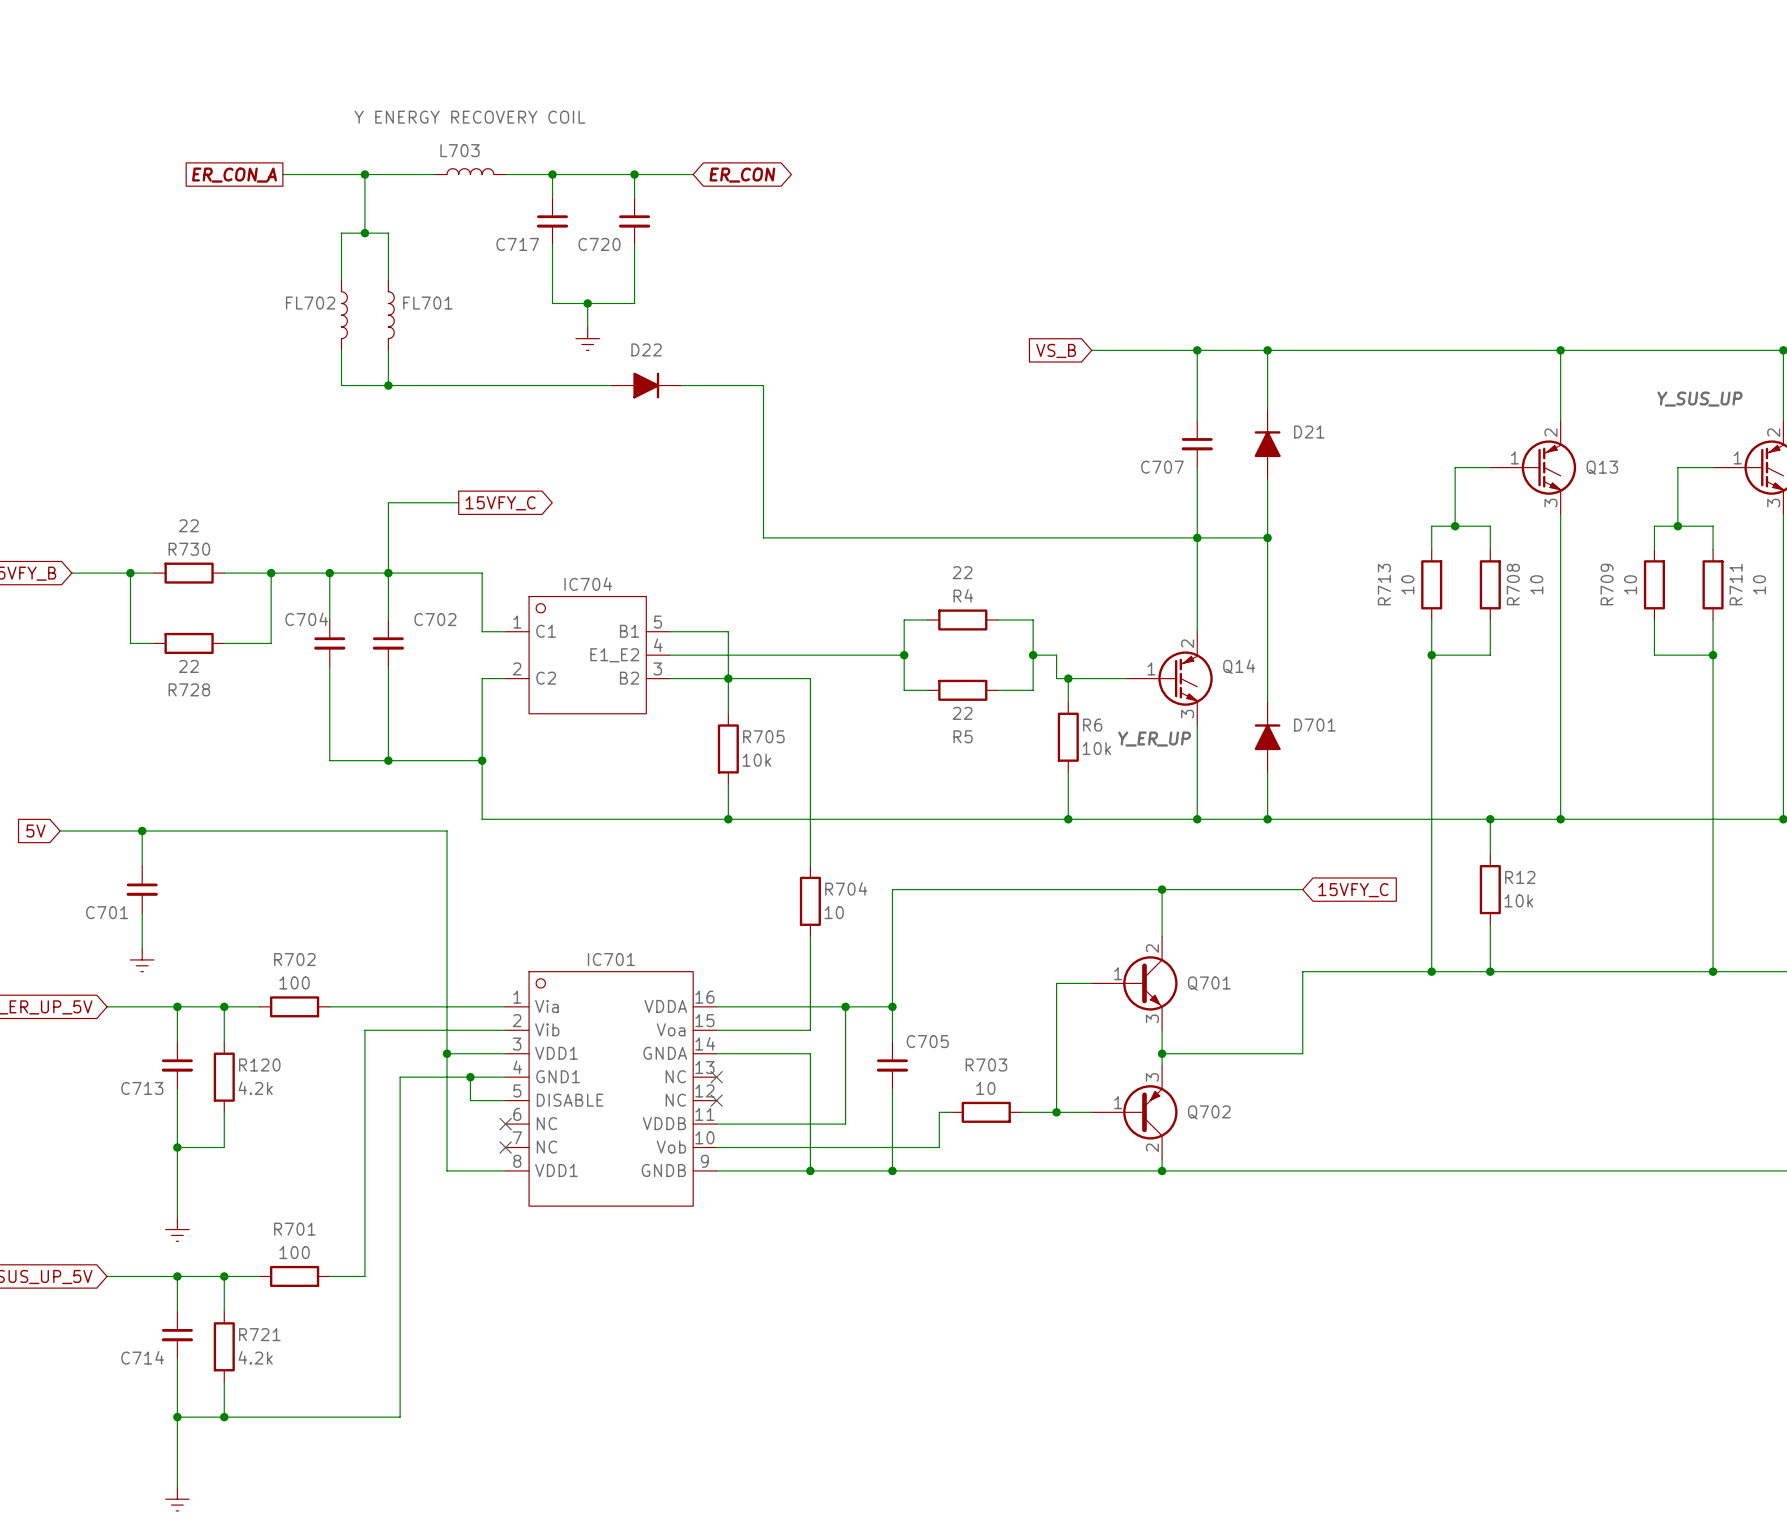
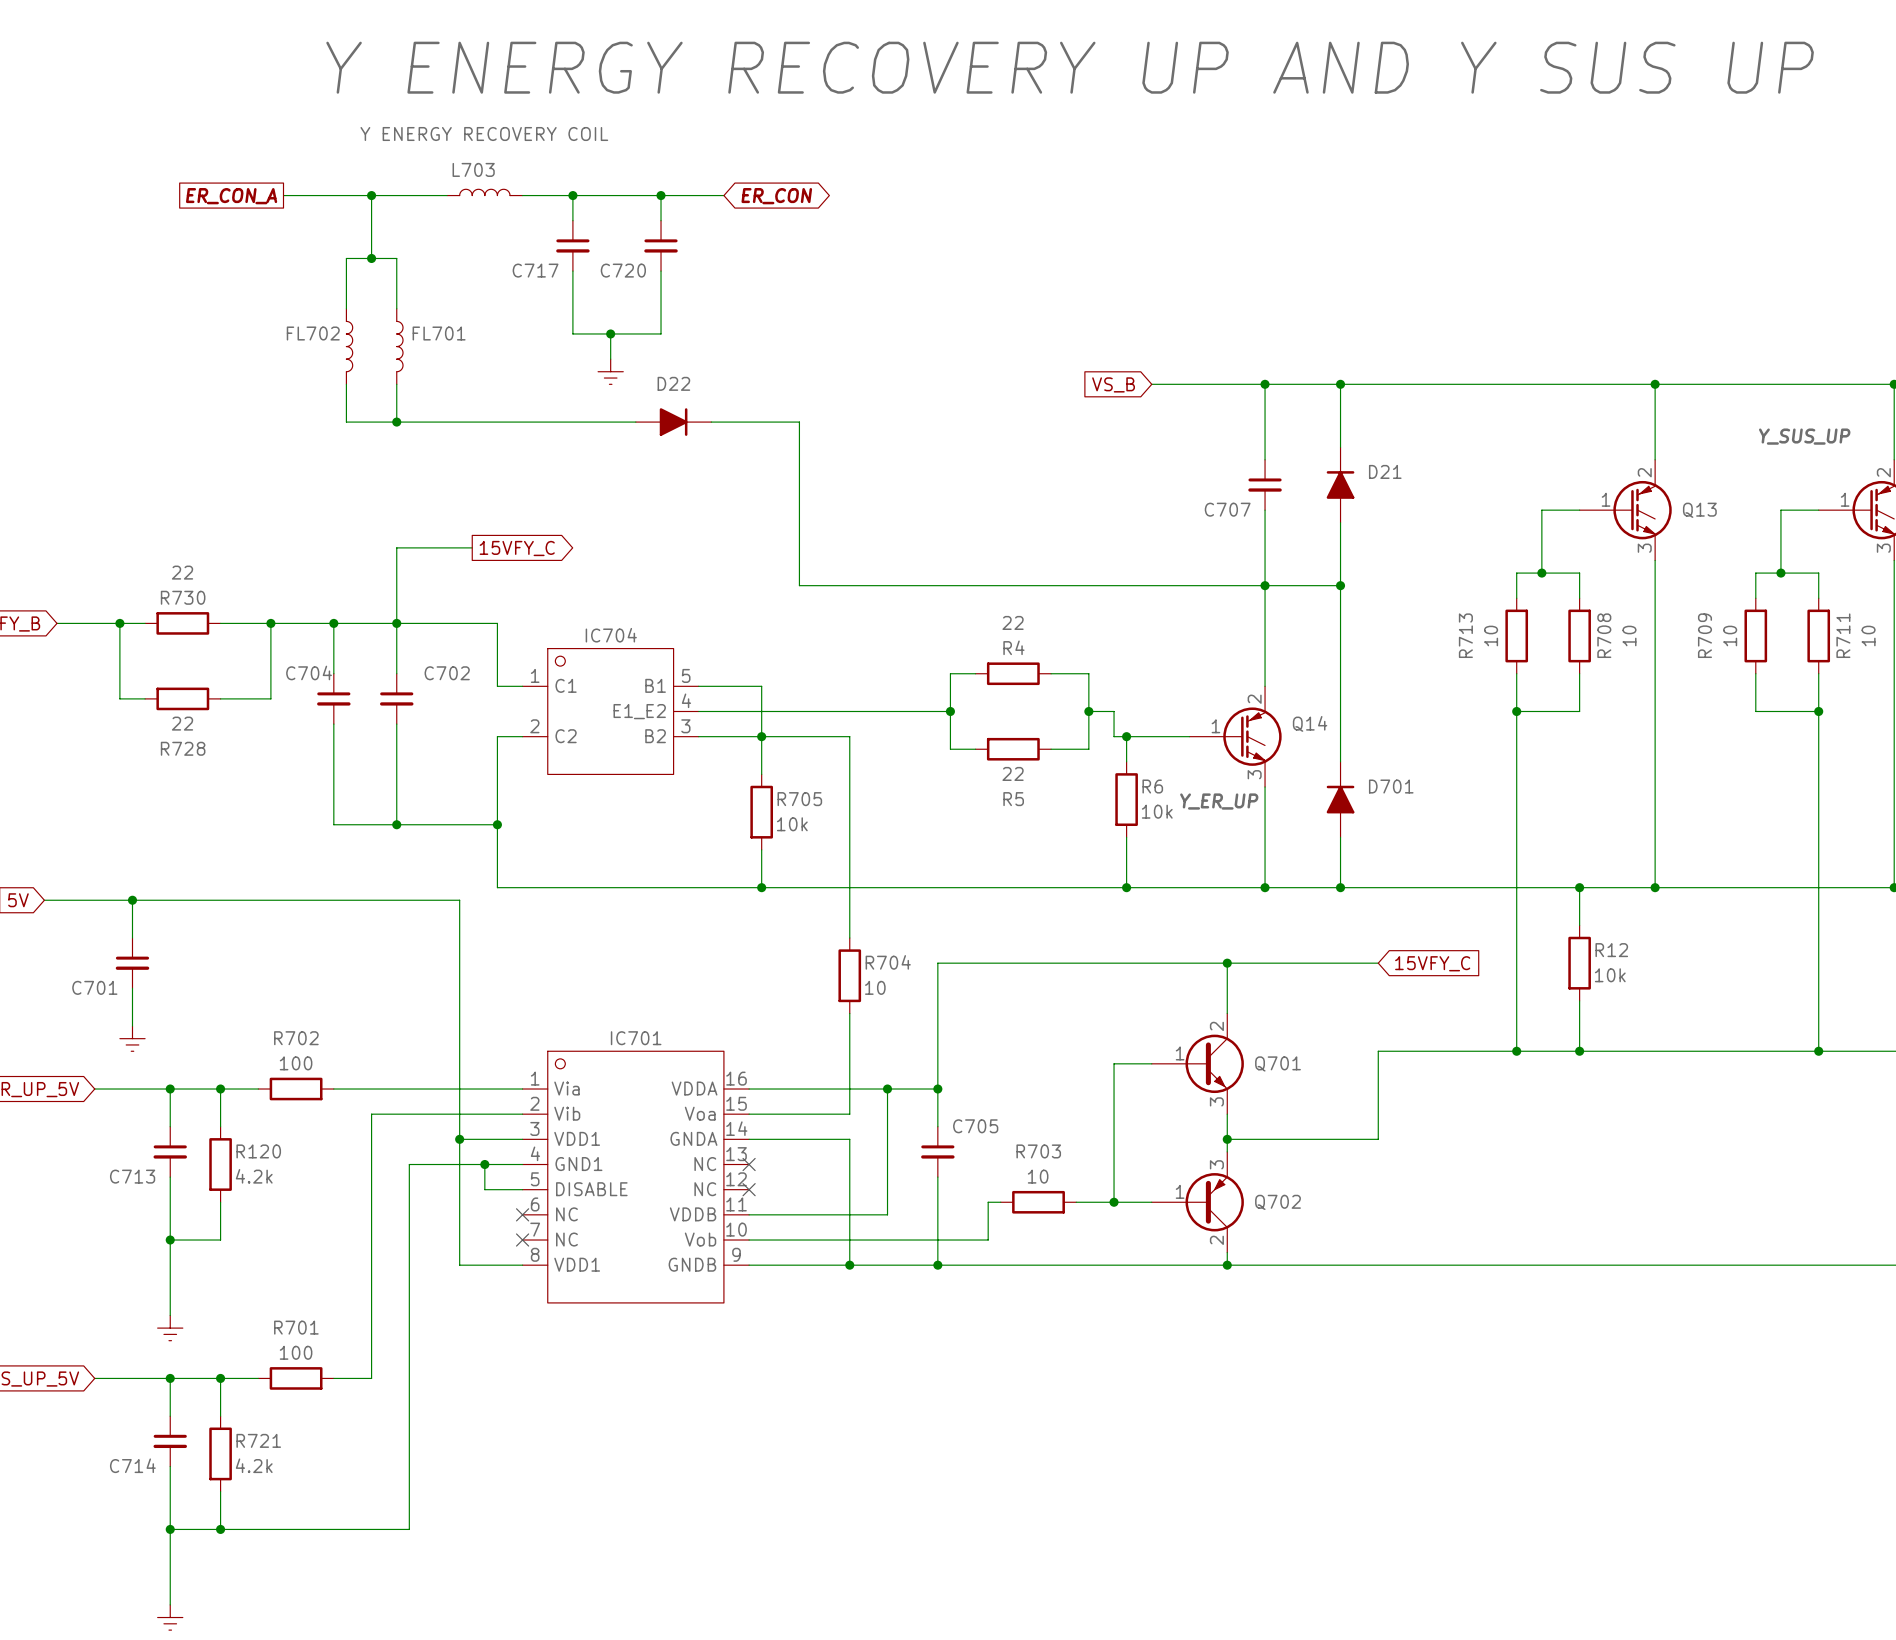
label: none -> Y ENERGY RECOVERY UP AND Y SUS UP (1070, 67)

